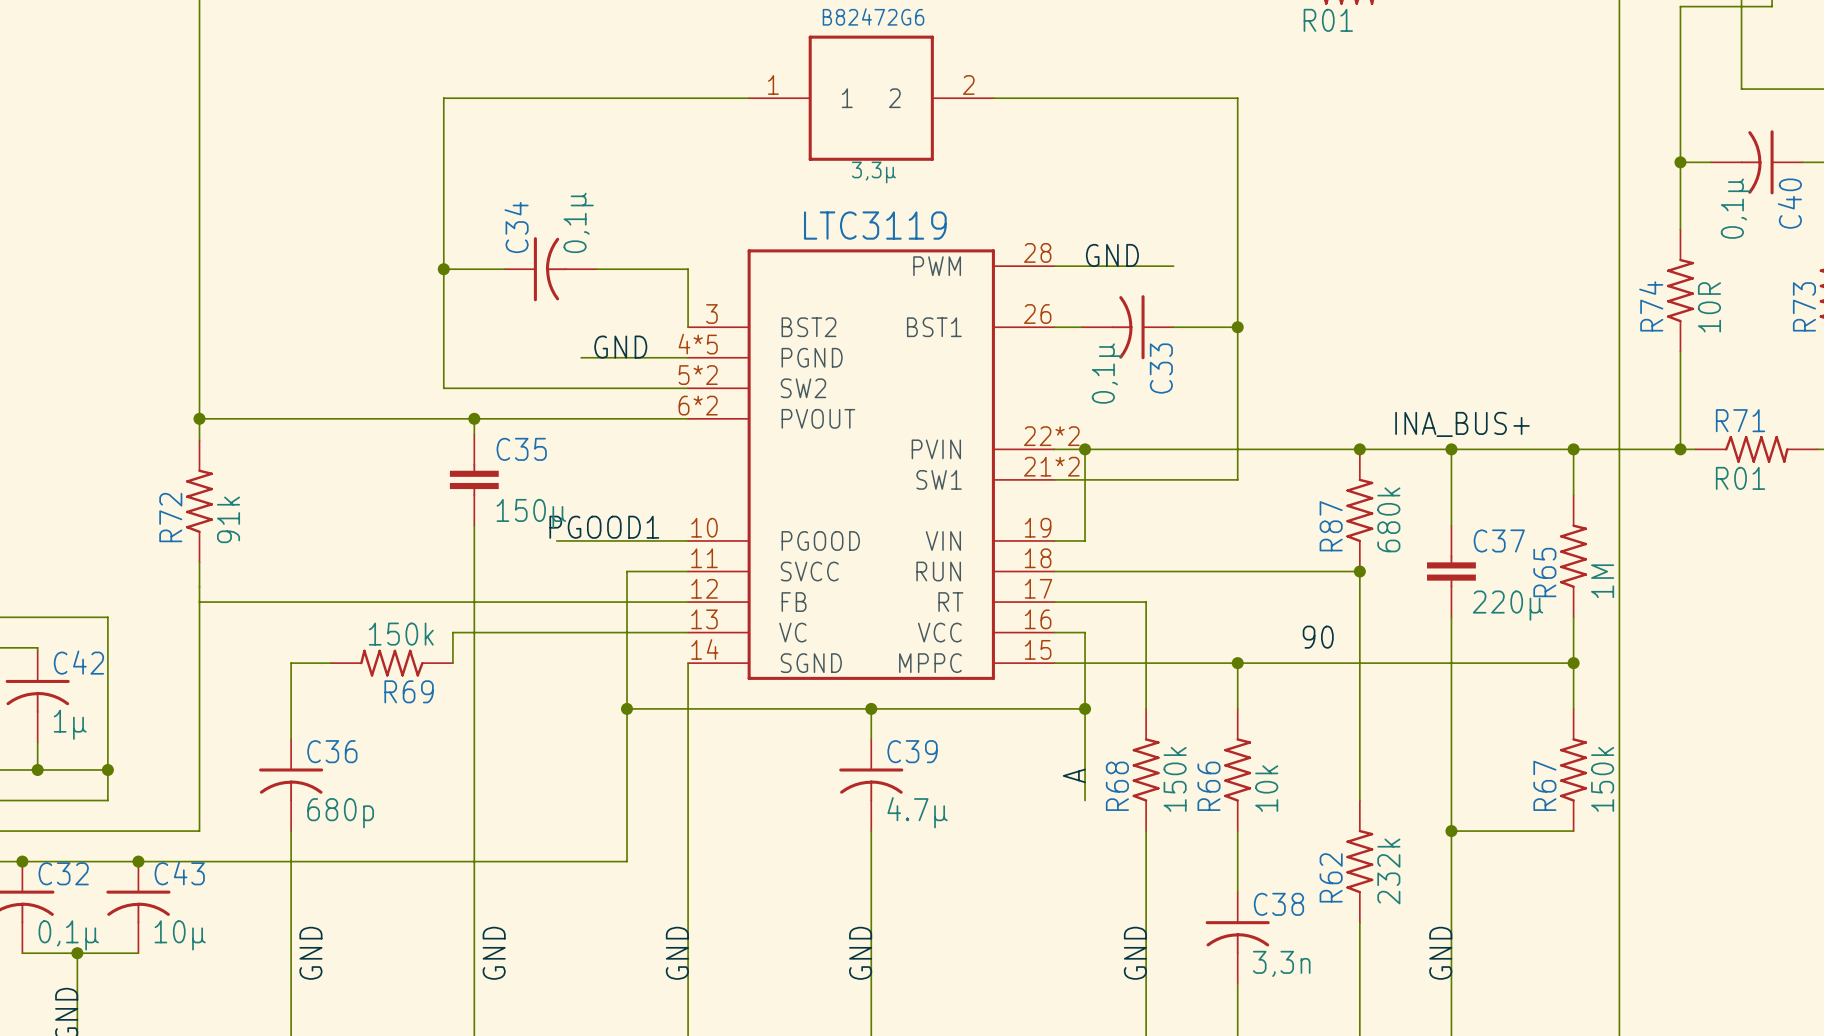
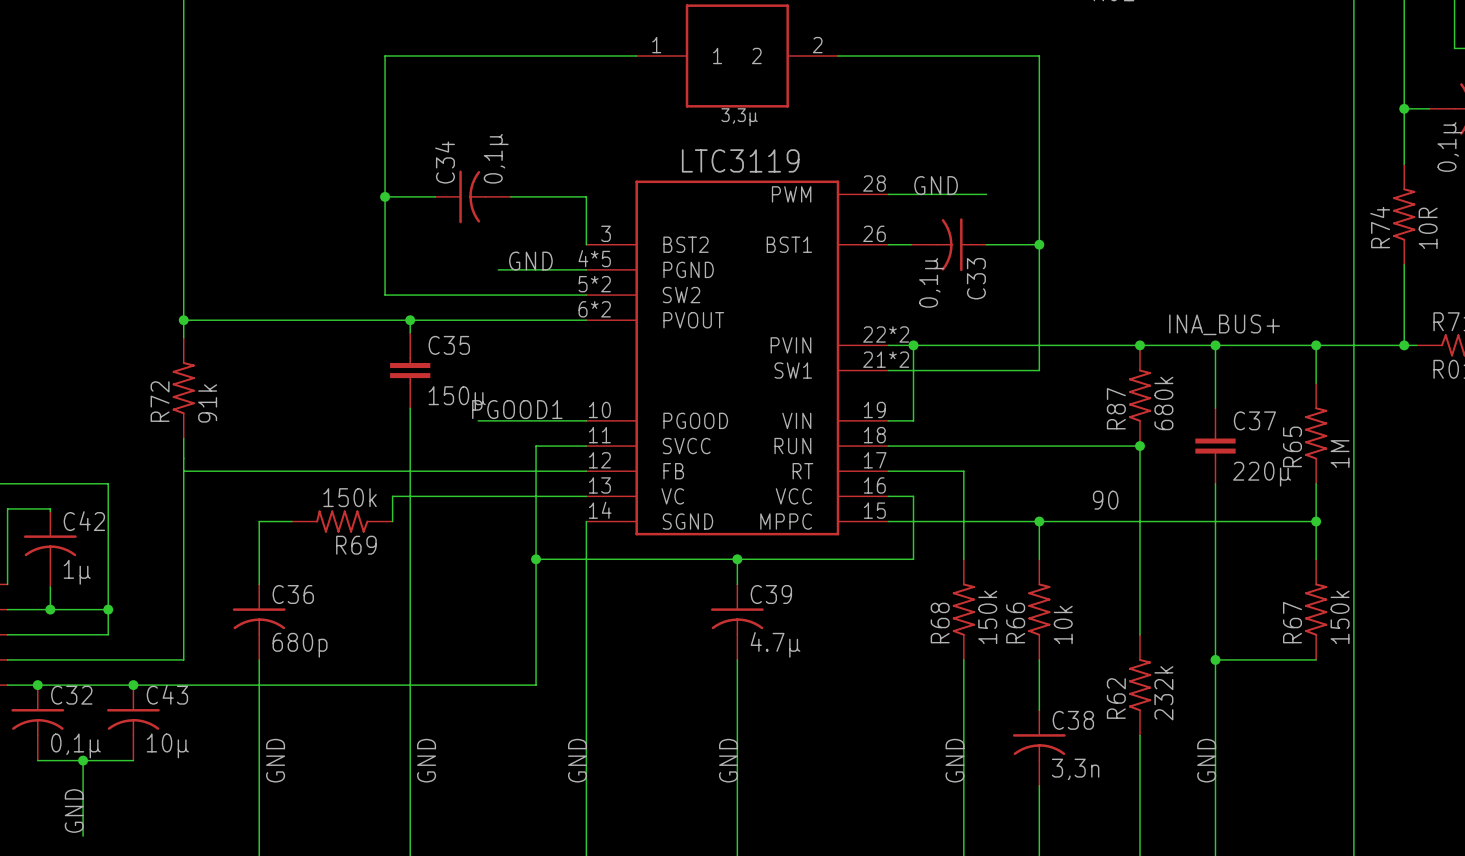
wire: (1085, 708) (1085, 800) -> none
junction: (1085, 708) -> none
label: A (1074, 775) -> none

